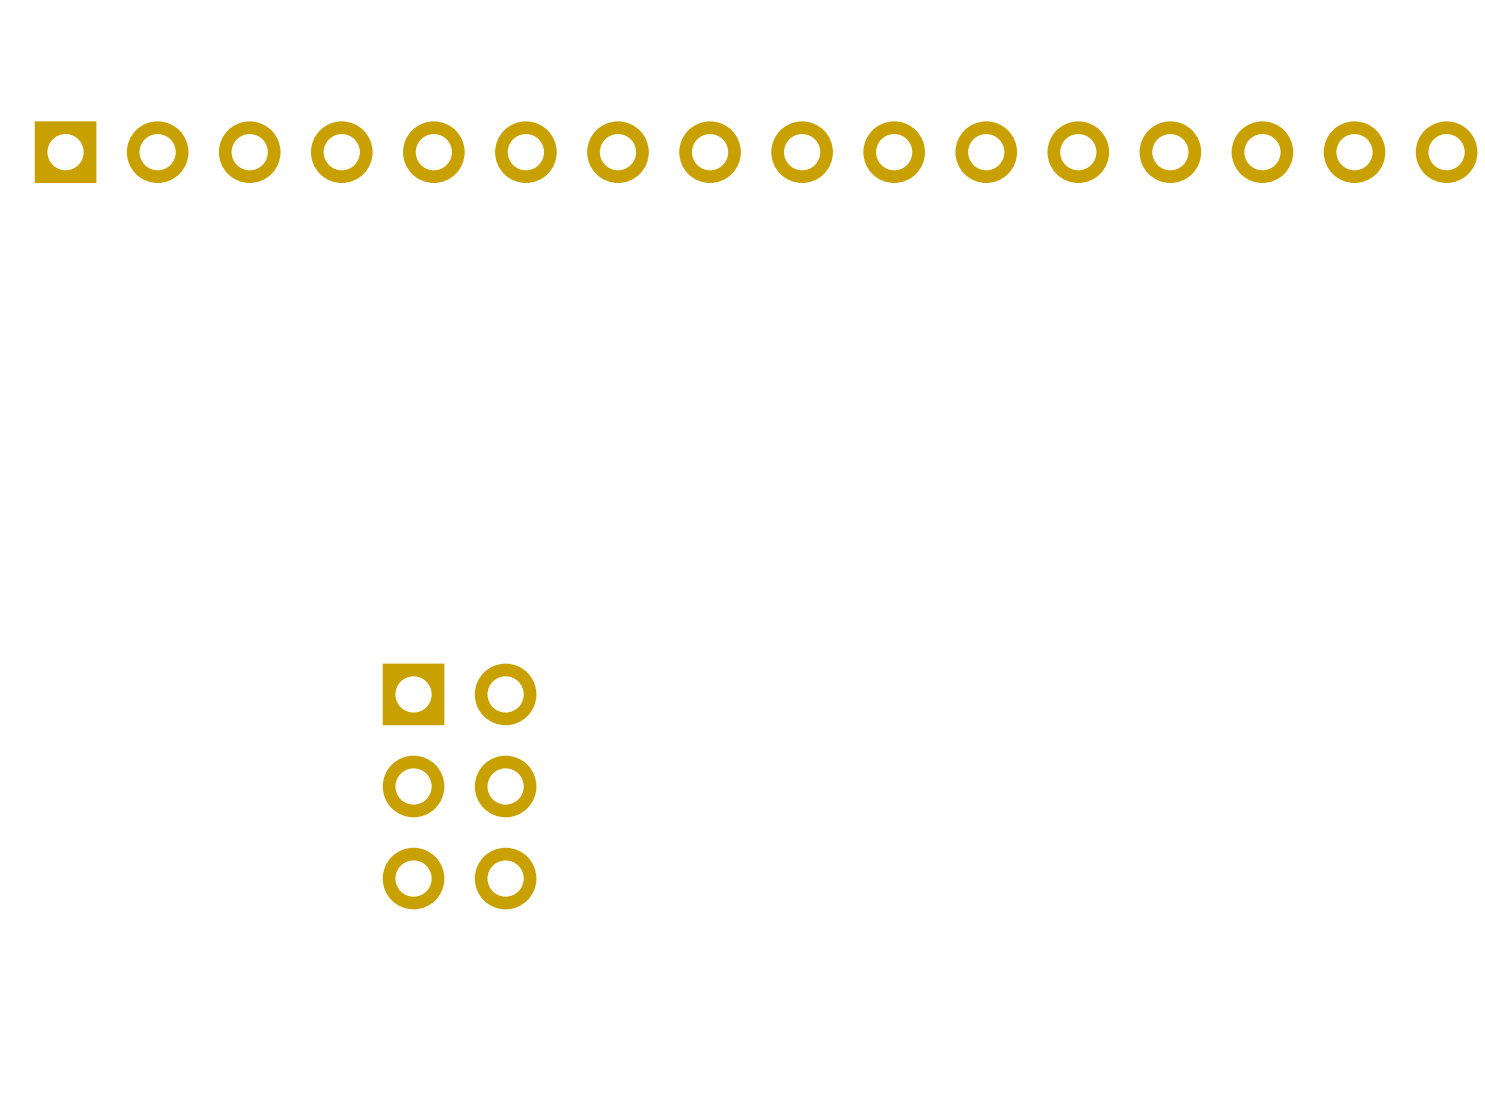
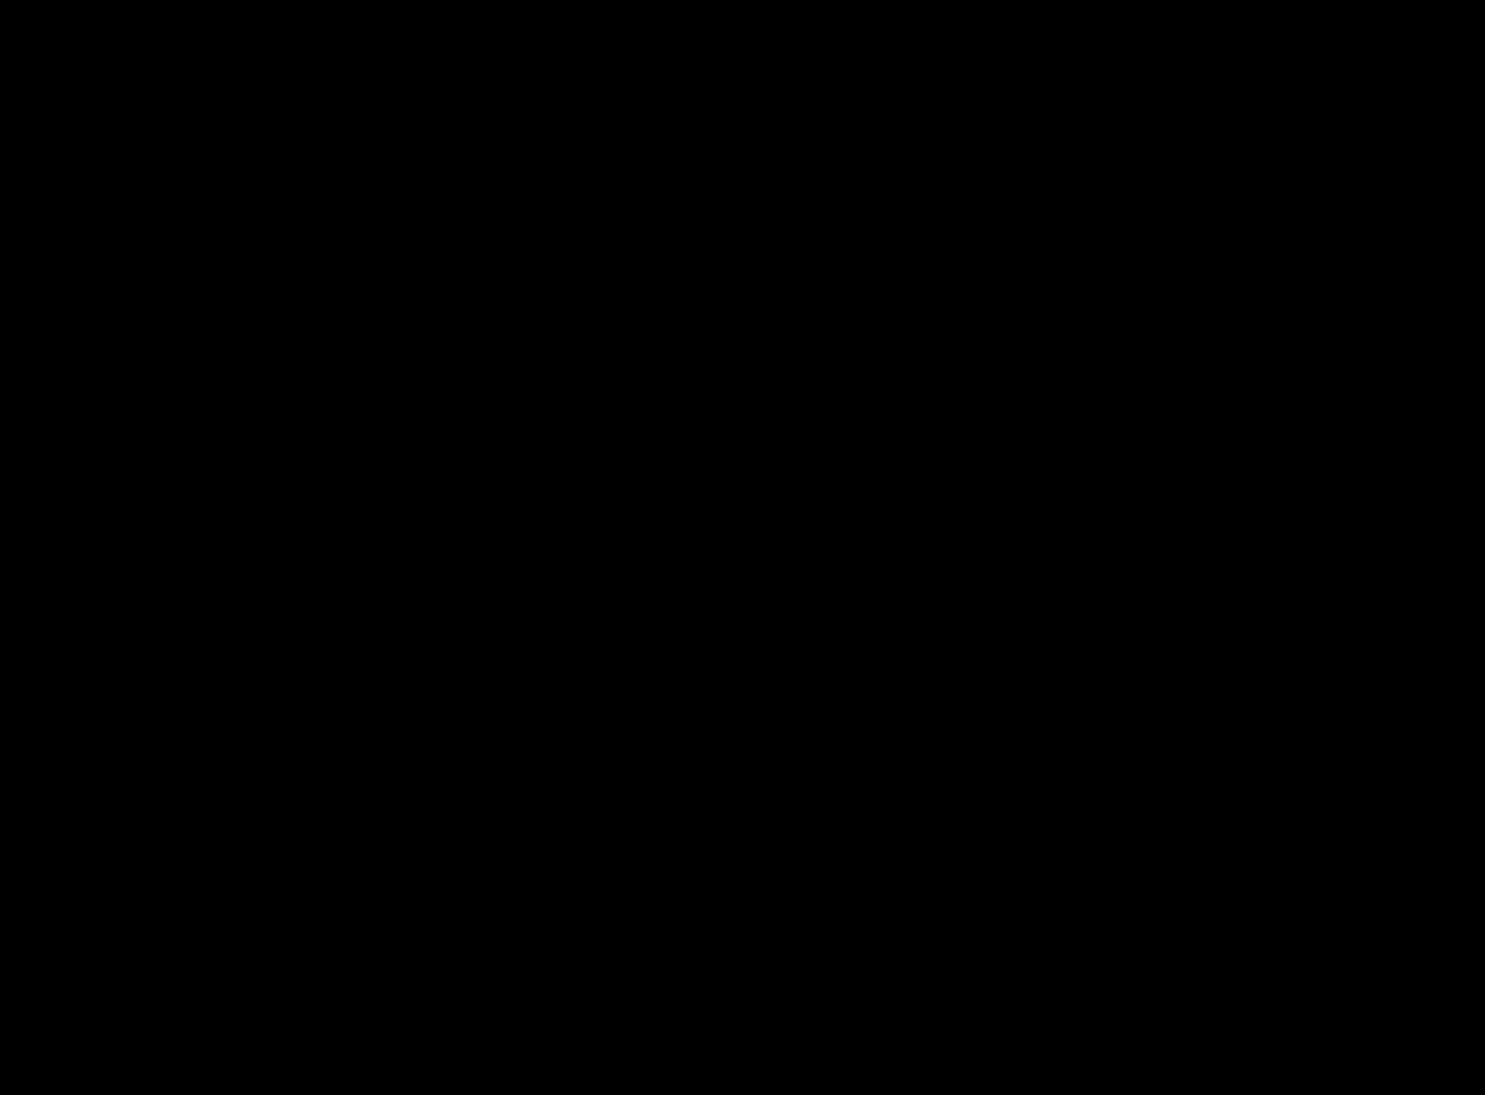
part: (756, 152) -> none
part: (459, 786) -> none

